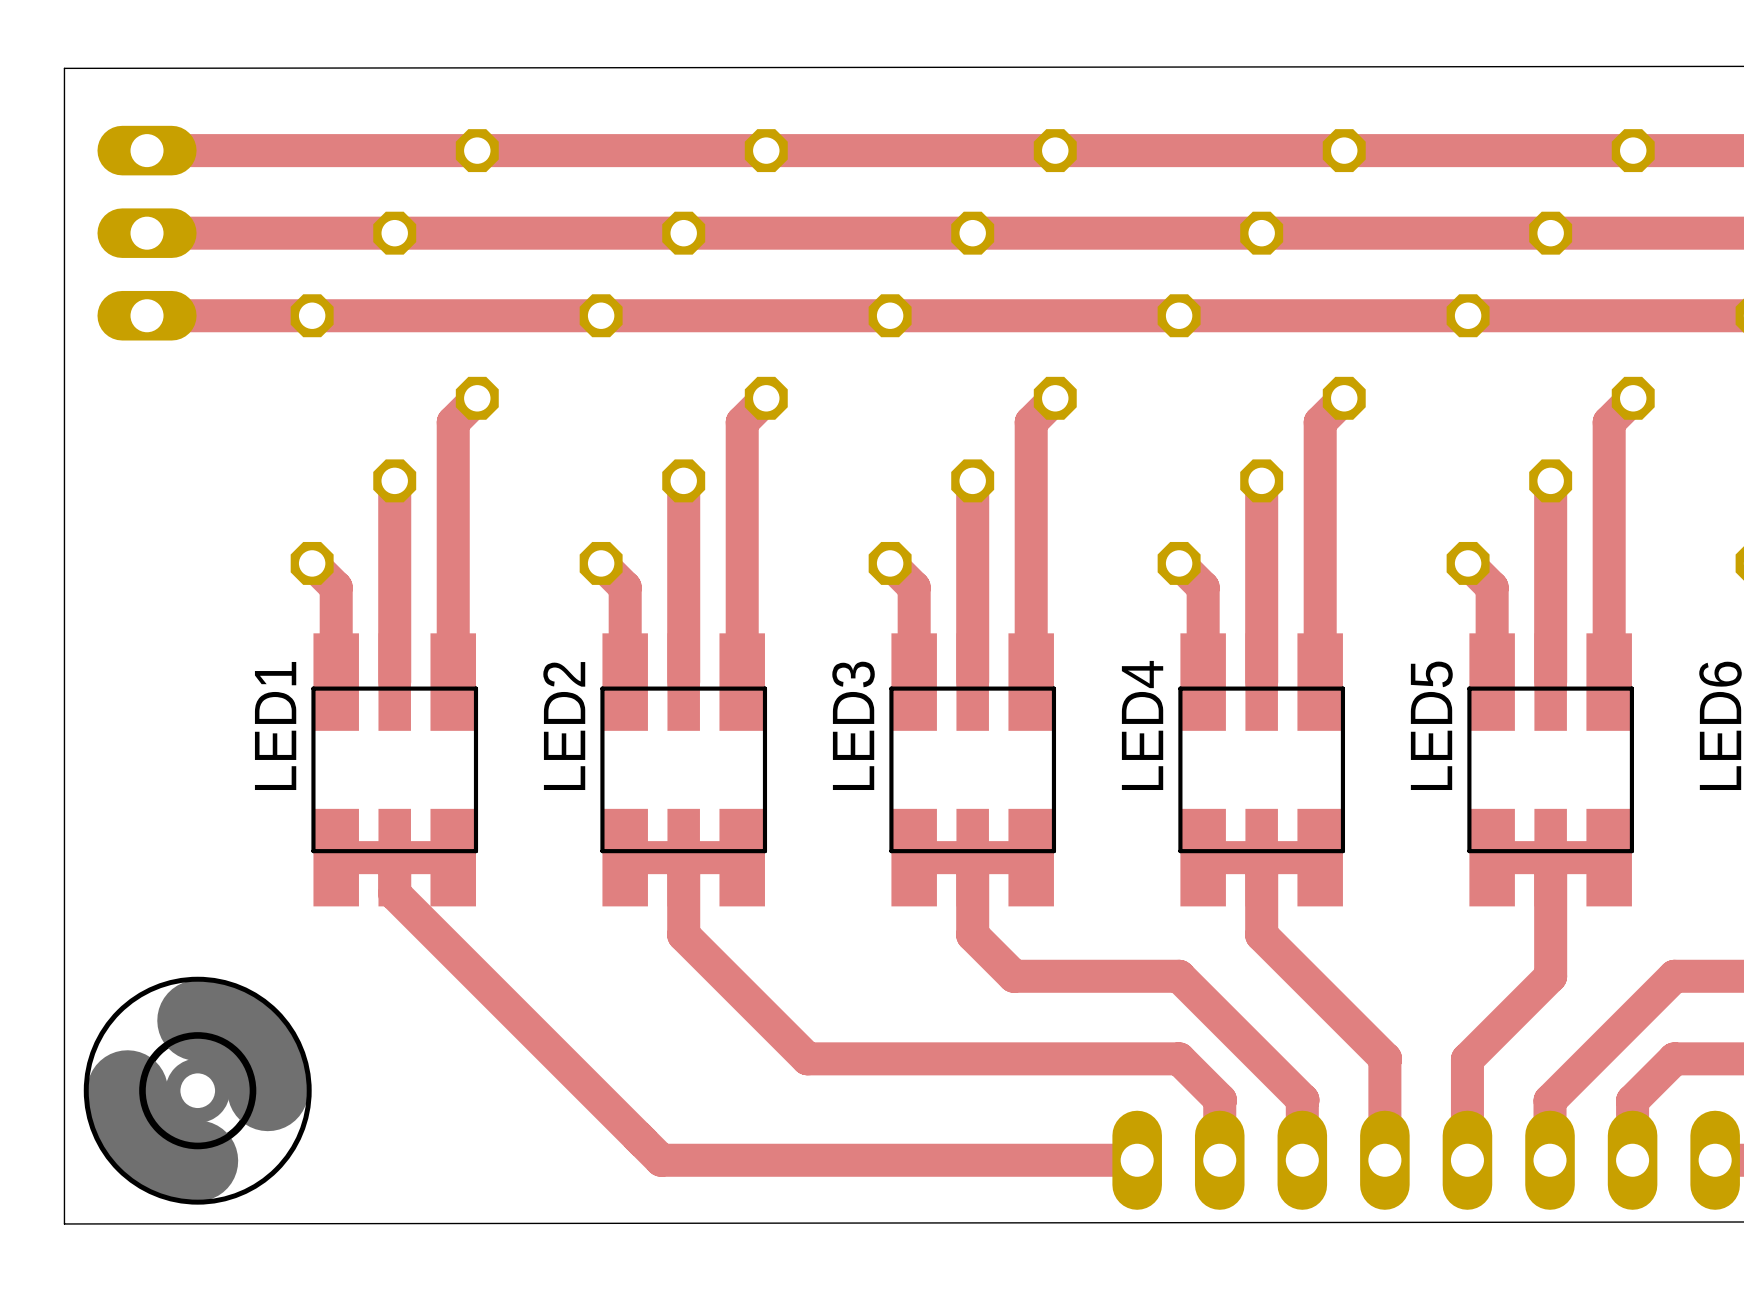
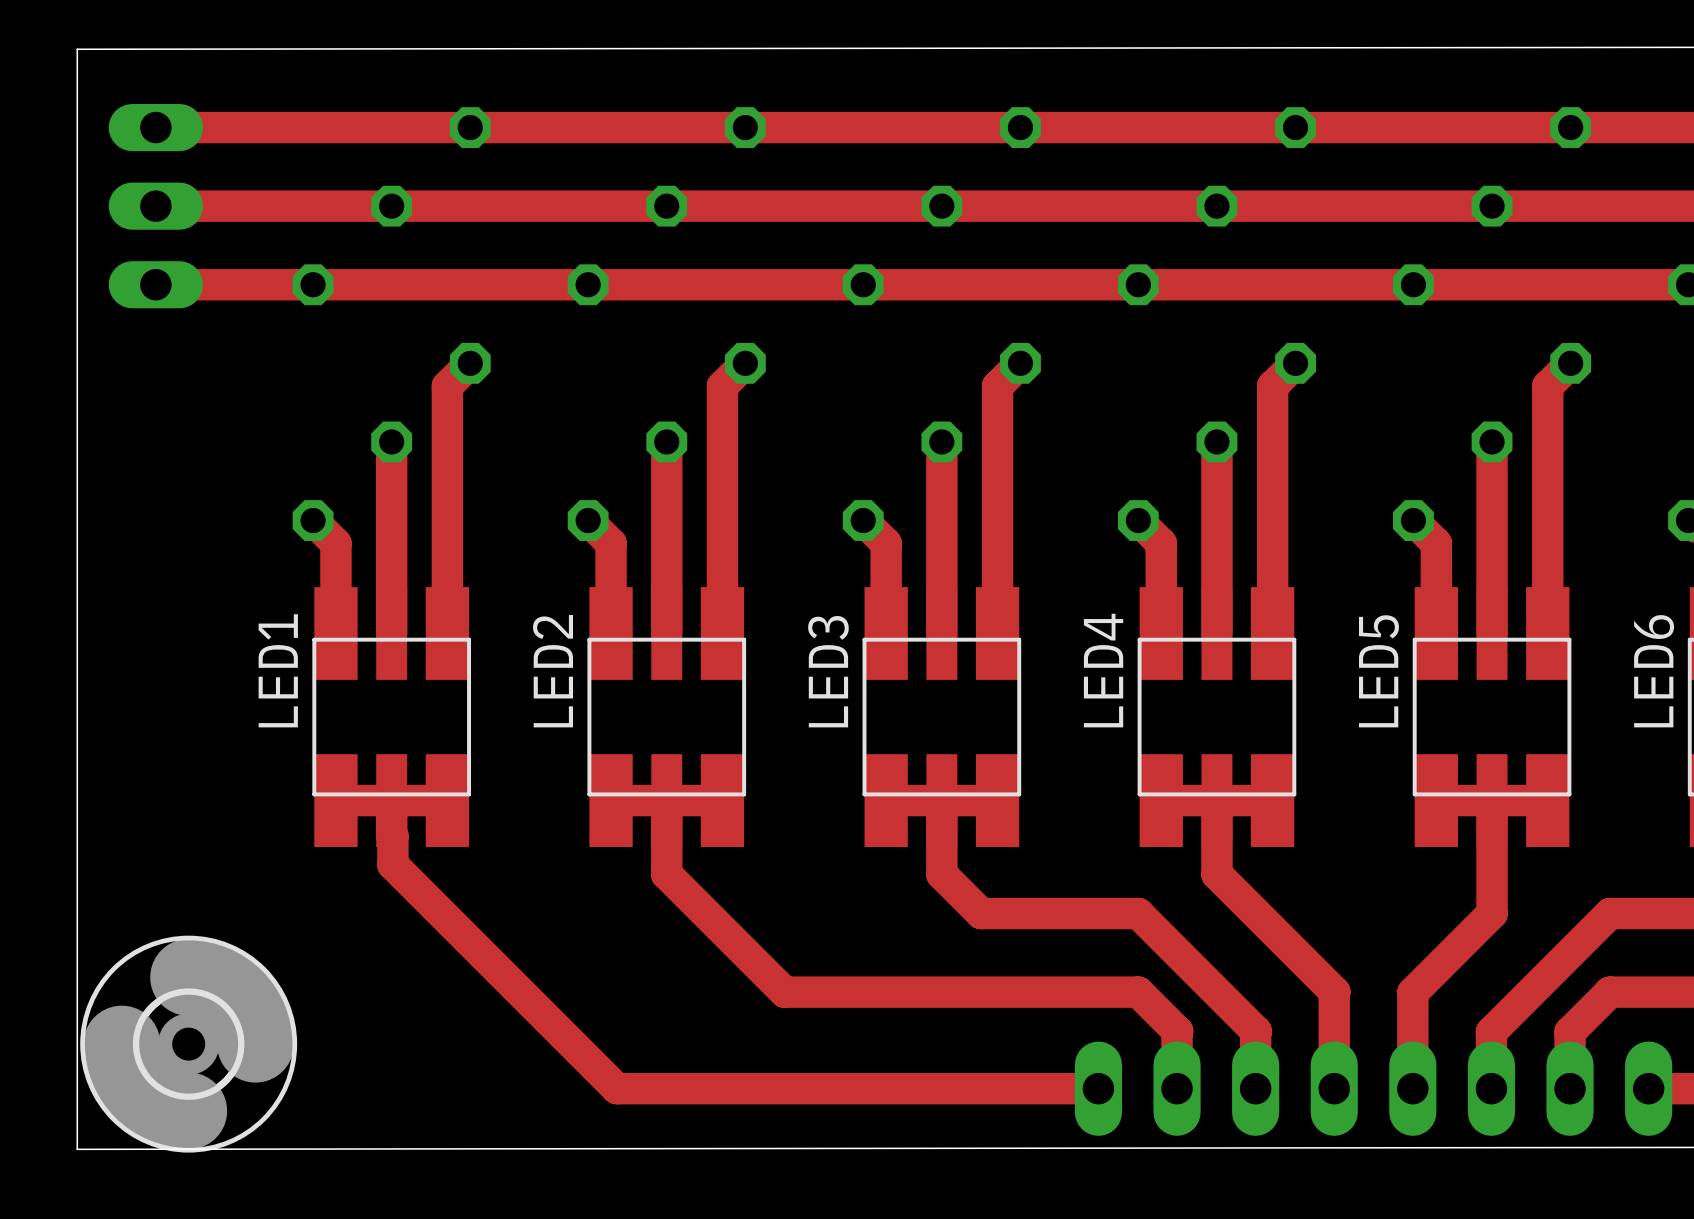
track: (396, 895) (661, 1160) -> (392, 836) (392, 864) (616, 1088) (645, 1088)
part position: (197, 1090) -> (188, 1044)

